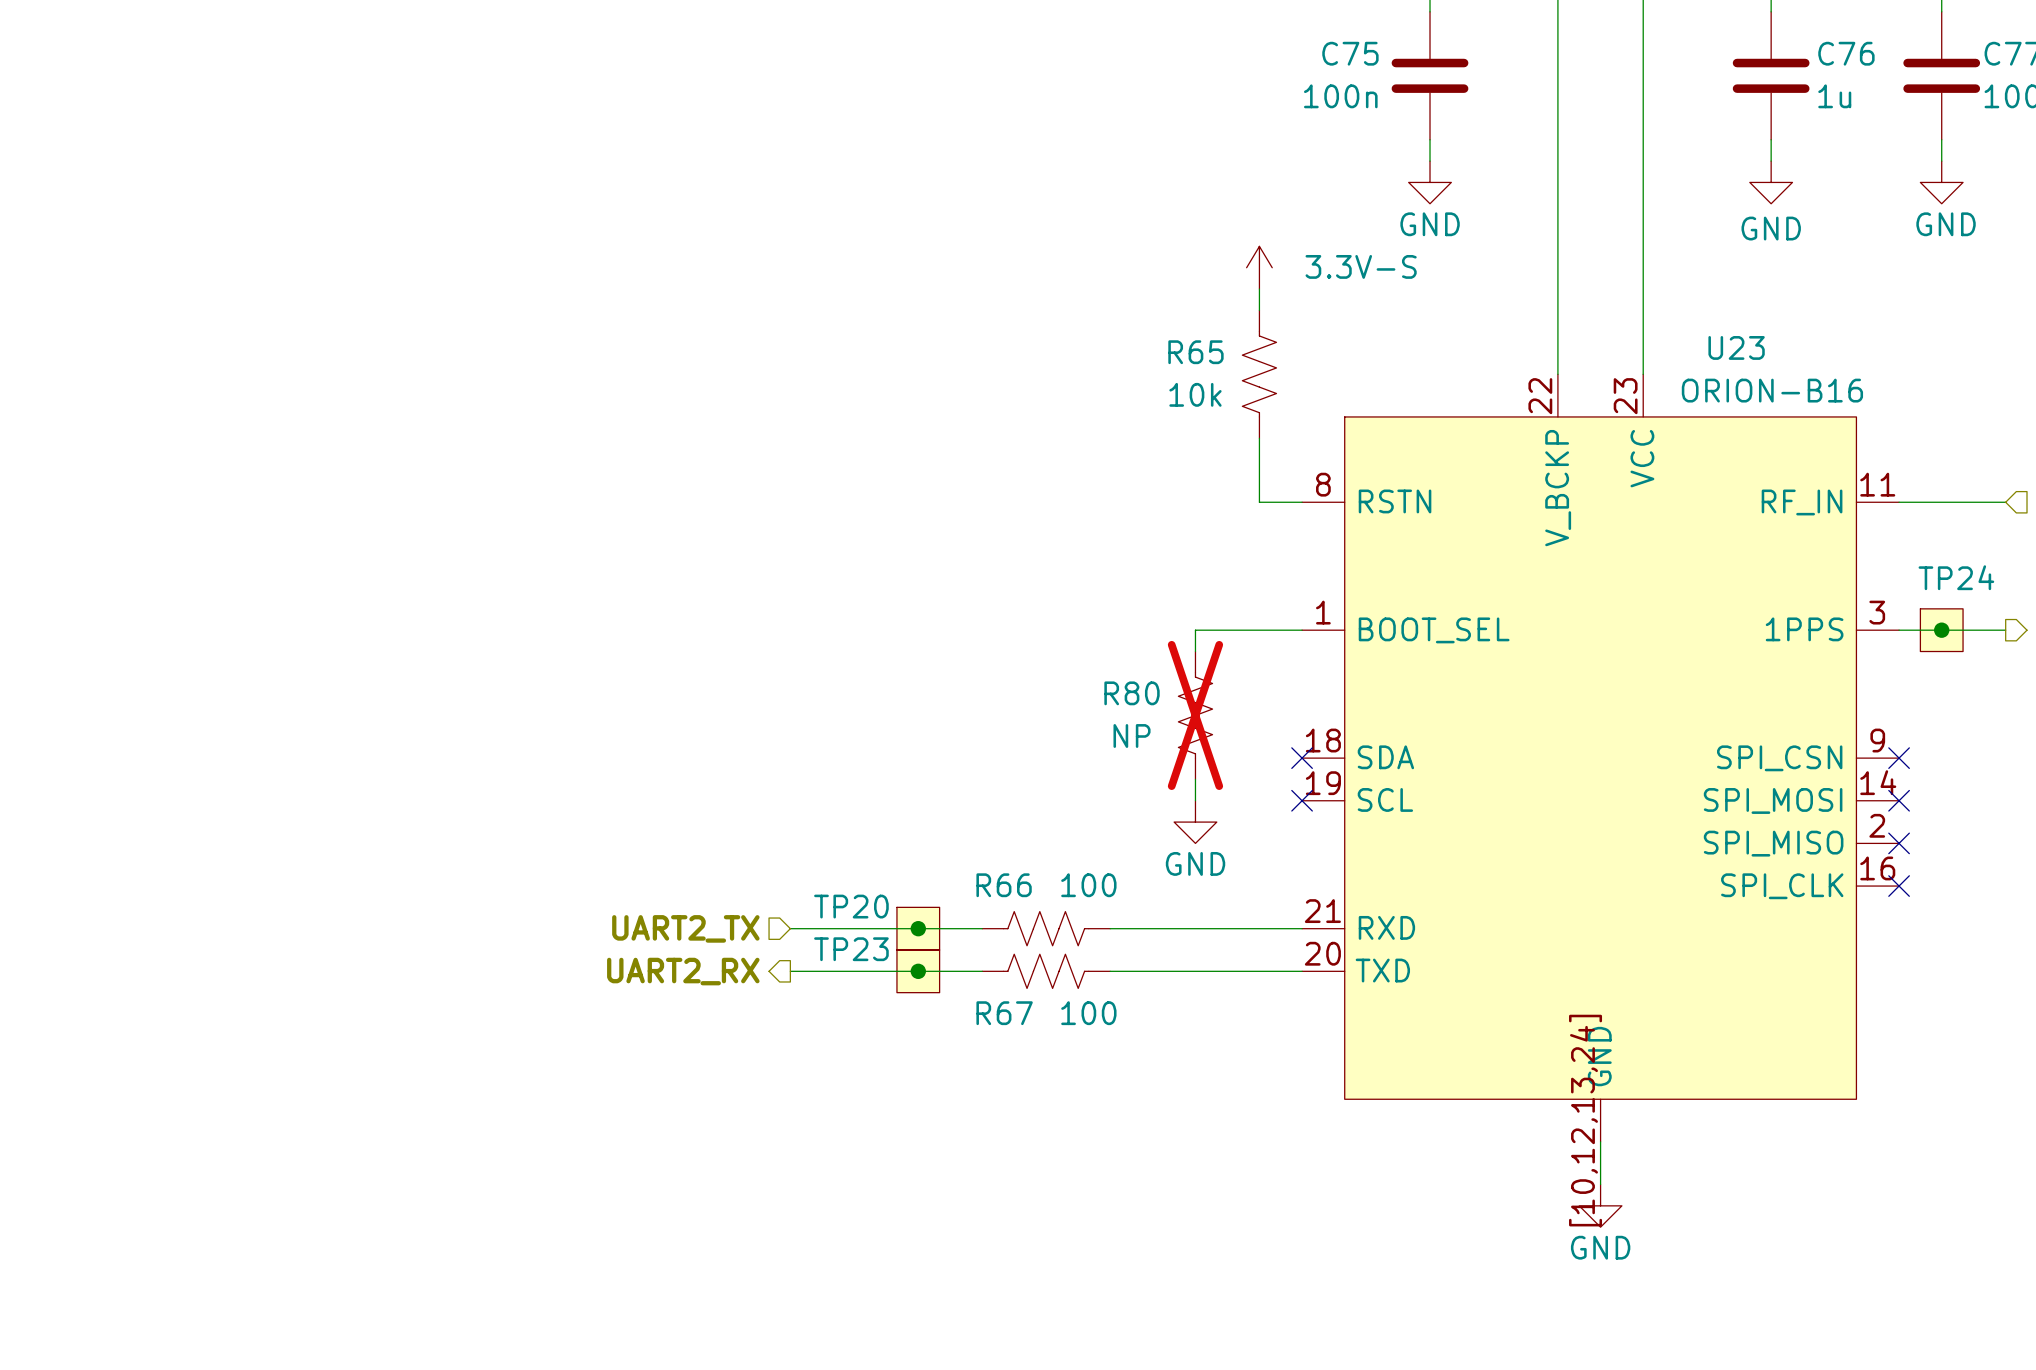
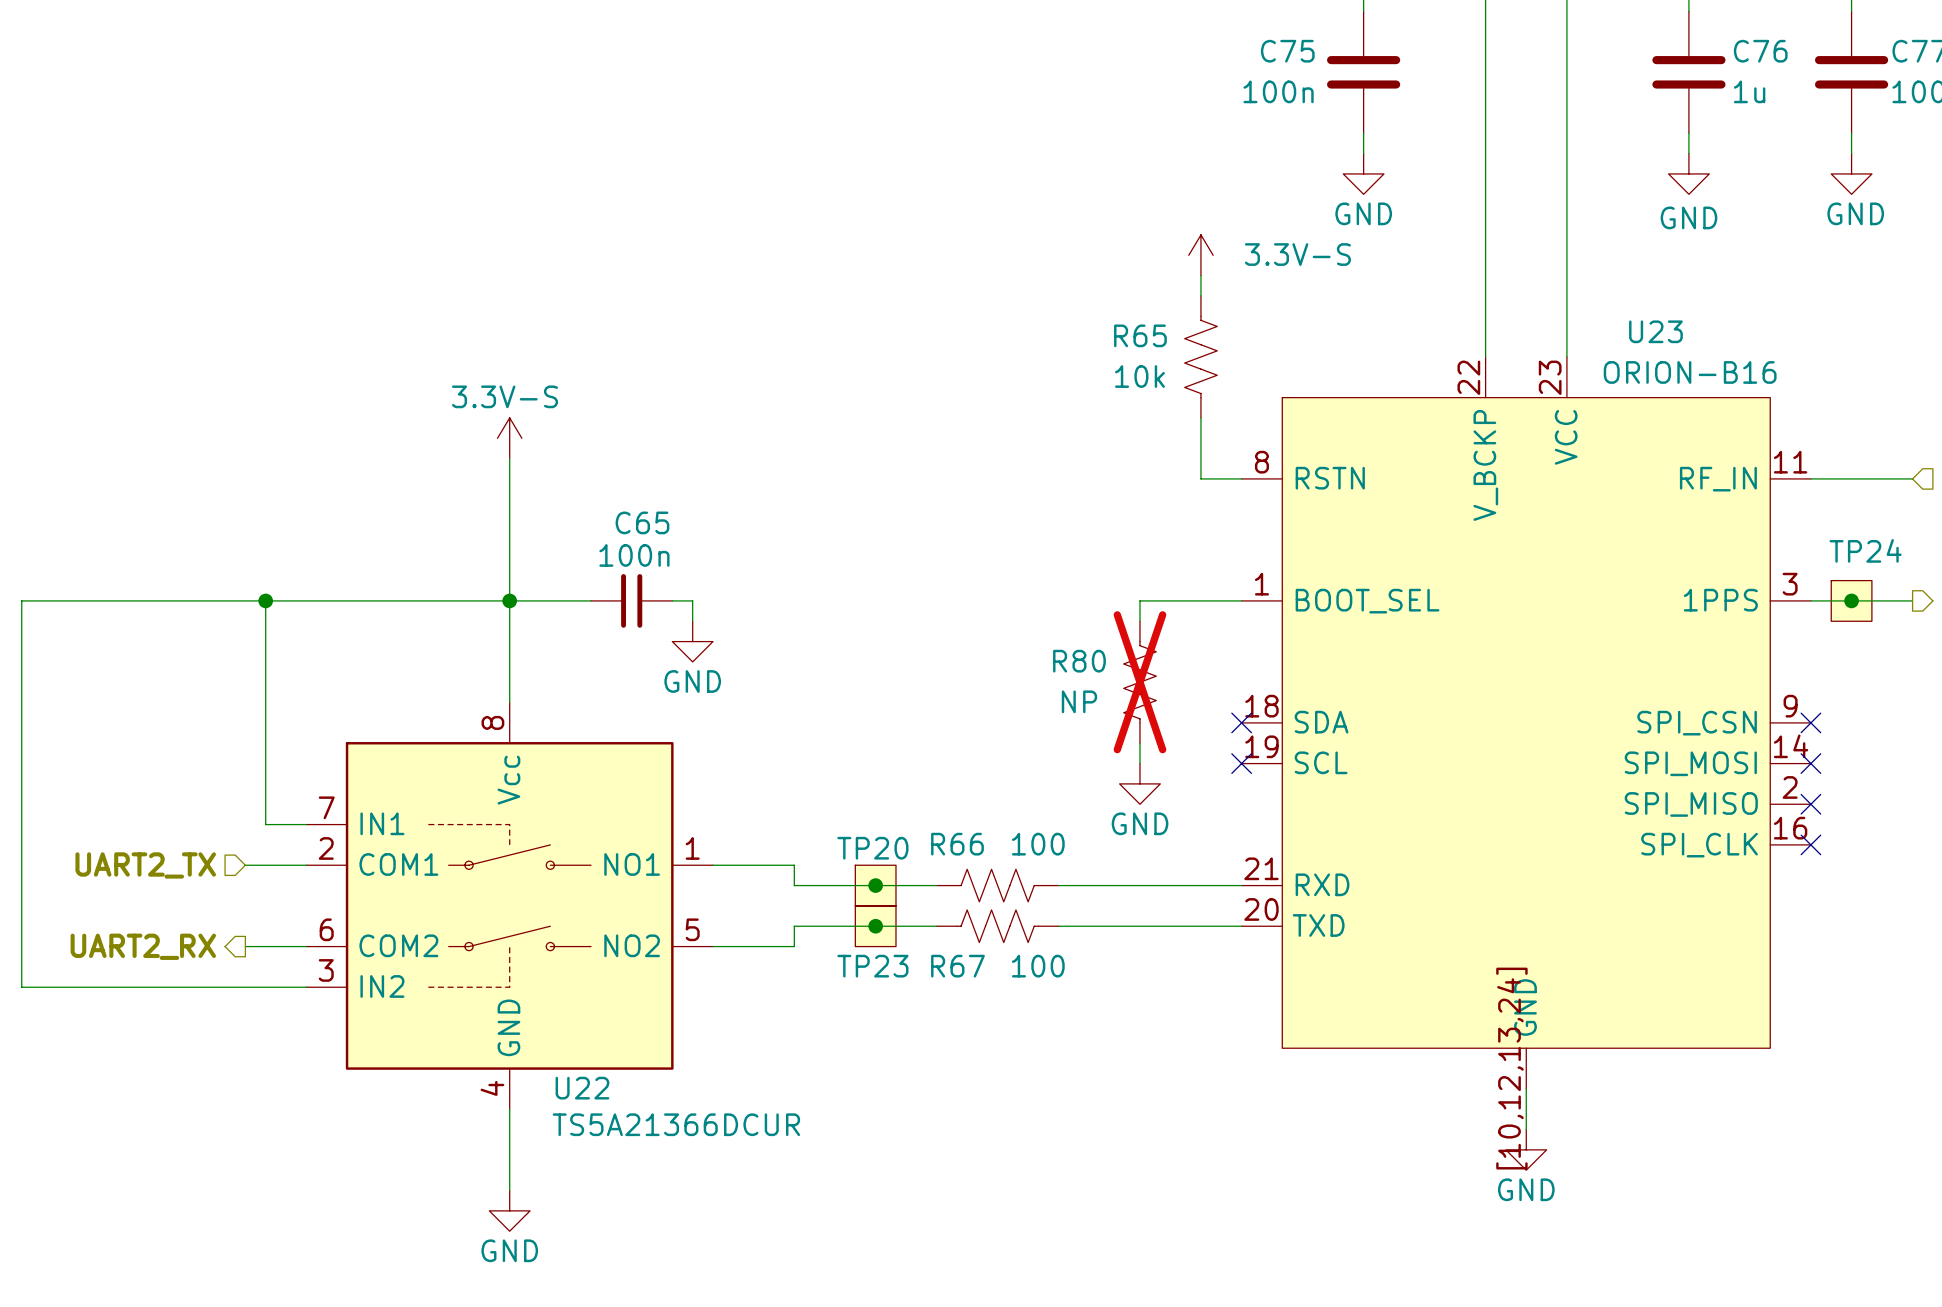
power symbol: none -> 3.3V-S (509, 438)
wire: none -> (509, 458) (509, 702)
wire: none -> (265, 600) (265, 824) (306, 824)
junction: none -> (265, 600)
junction: none -> (509, 600)
wire: none -> (591, 600) (21, 600) (21, 987) (306, 987)
C65: none -> 100n (631, 600)
wire: none -> (672, 600) (692, 600) (692, 621)
power symbol: none -> GND (692, 641)
TP20 name position: TP20 (851, 906) -> TP20 (872, 848)
hierarchical label: none -> UART2_TX (145, 865)
wire: none -> (245, 865) (306, 865)
hierarchical label: UART2_TX (685, 928) -> none
wire: (790, 928) (833, 928) -> (713, 865) (794, 865) (794, 885)
TP23 name position: TP23 (851, 949) -> TP23 (872, 966)
U22: none -> TS5A21366DCUR (509, 905)
hierarchical label: UART2_RX (683, 971) -> none
wire: (790, 971) (833, 971) -> (713, 946) (794, 946) (794, 926)
hierarchical label: none -> UART2_RX (143, 946)
wire: none -> (245, 946) (306, 946)
wire: none -> (509, 1109) (509, 1190)
power symbol: none -> GND (509, 1210)

